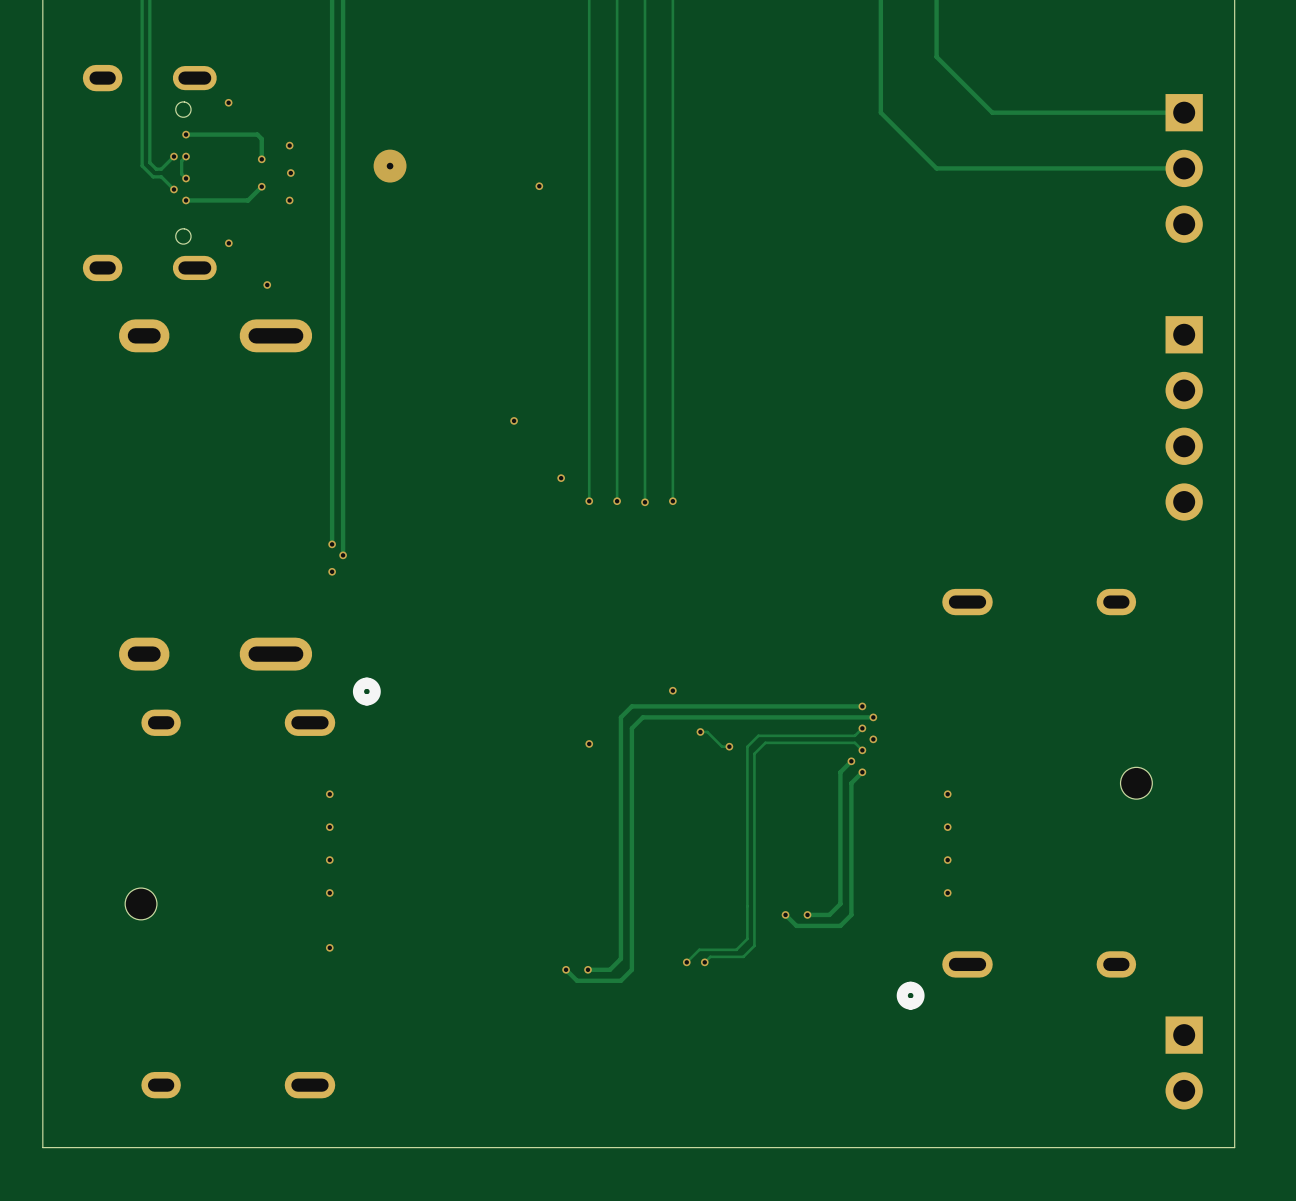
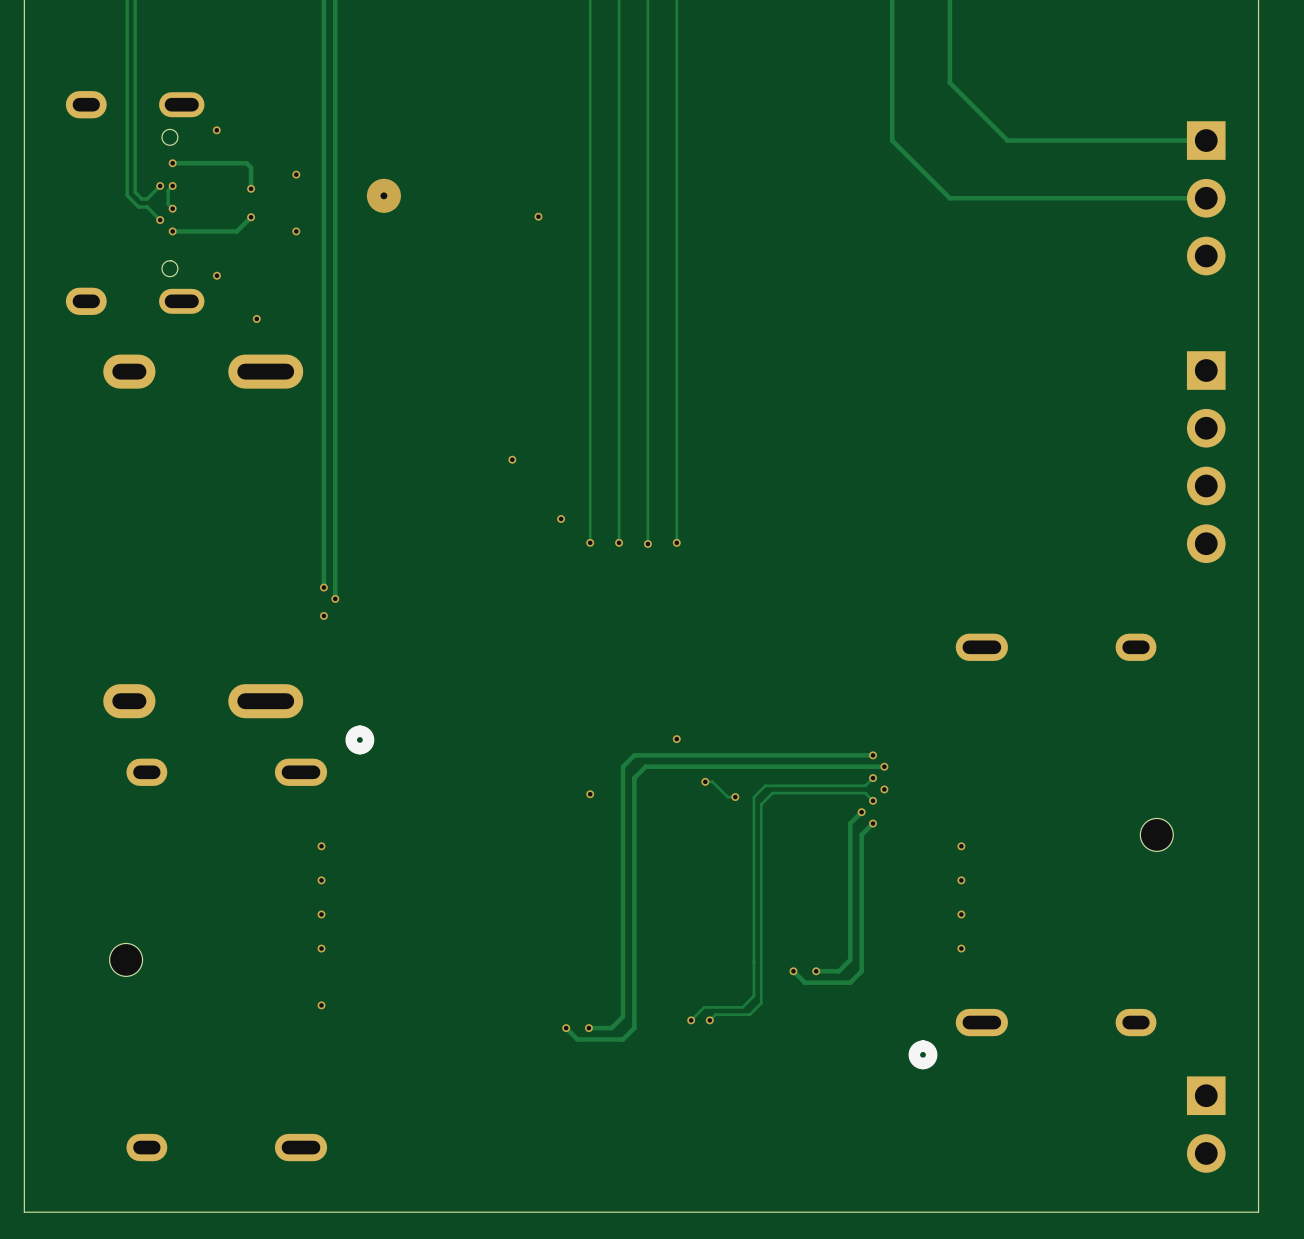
via: (289, 145) -> none
via: none -> (296, 174)
via: (290, 173) -> none
via: (289, 200) -> none
via: none -> (296, 231)

